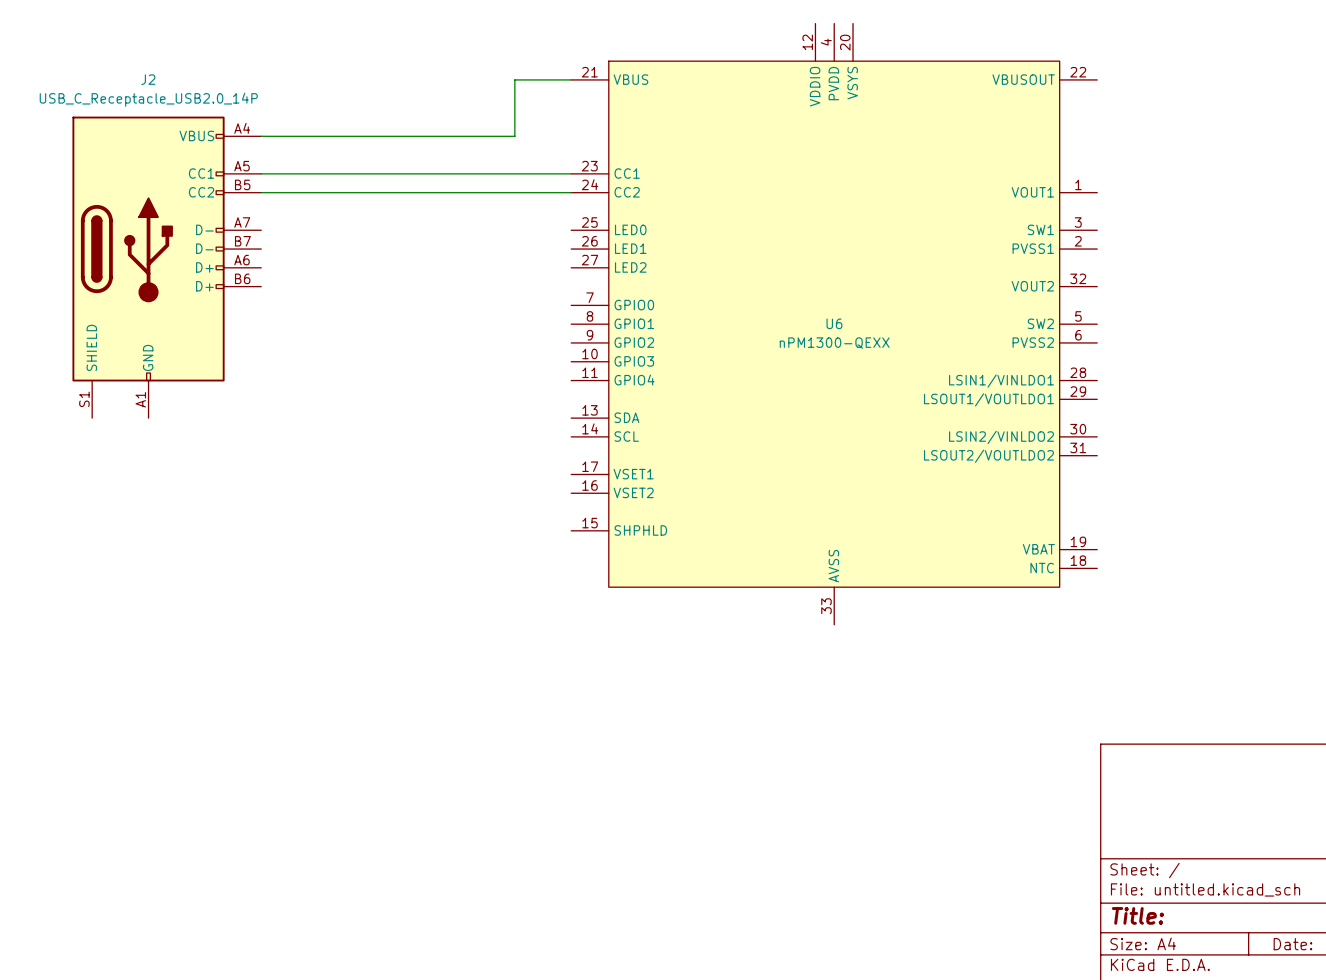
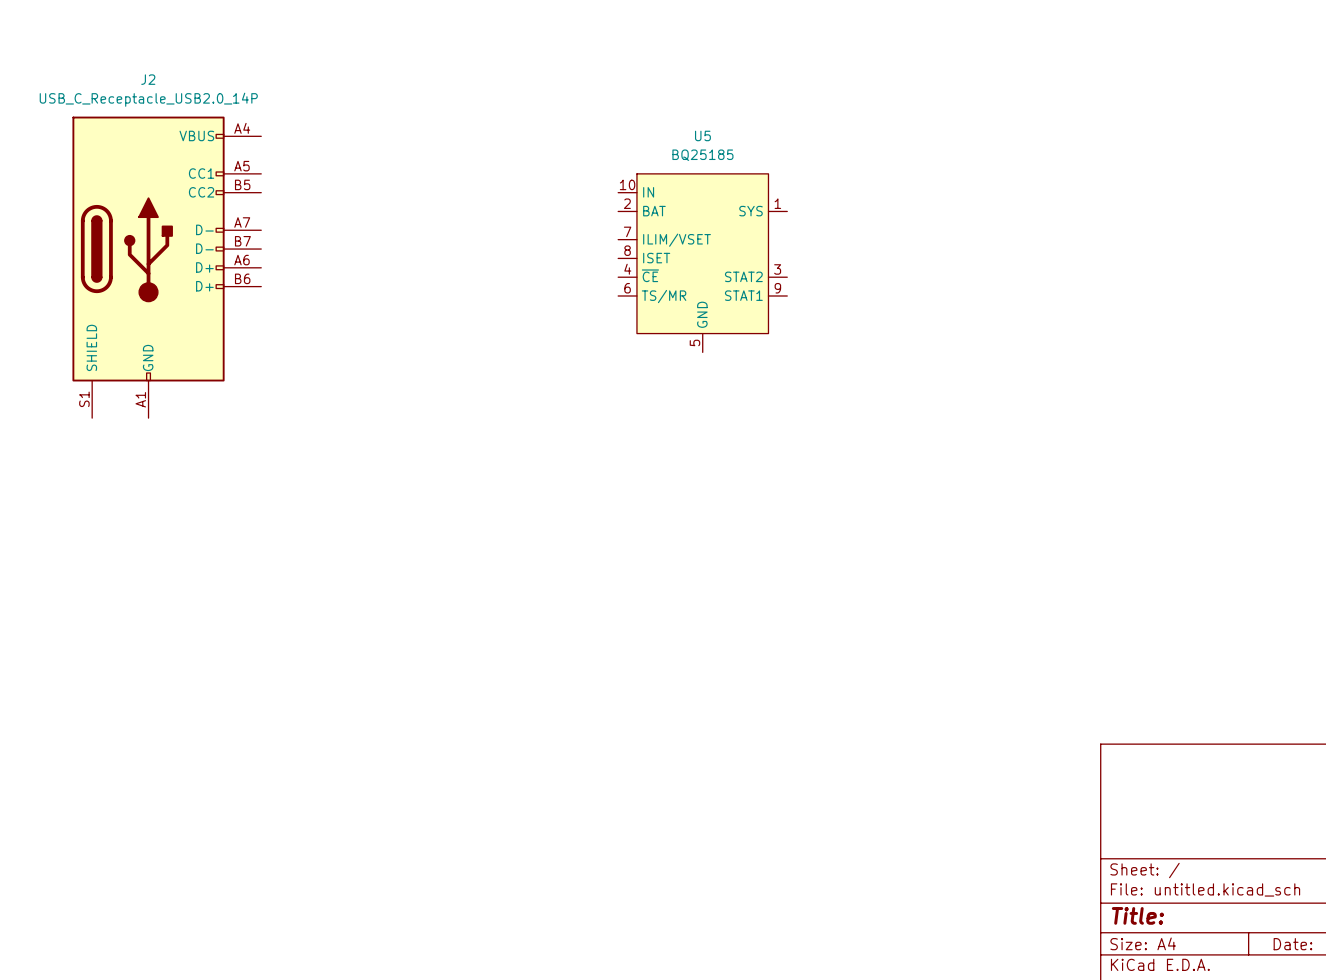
wire: (571, 79) (514, 79) (514, 136) (261, 136) -> none
wire: (261, 173) (571, 173) -> none
wire: (261, 192) (571, 192) -> none
U5: none -> BQ25185 (702, 263)
U6: nPM1300-QEXX (834, 324) -> none

